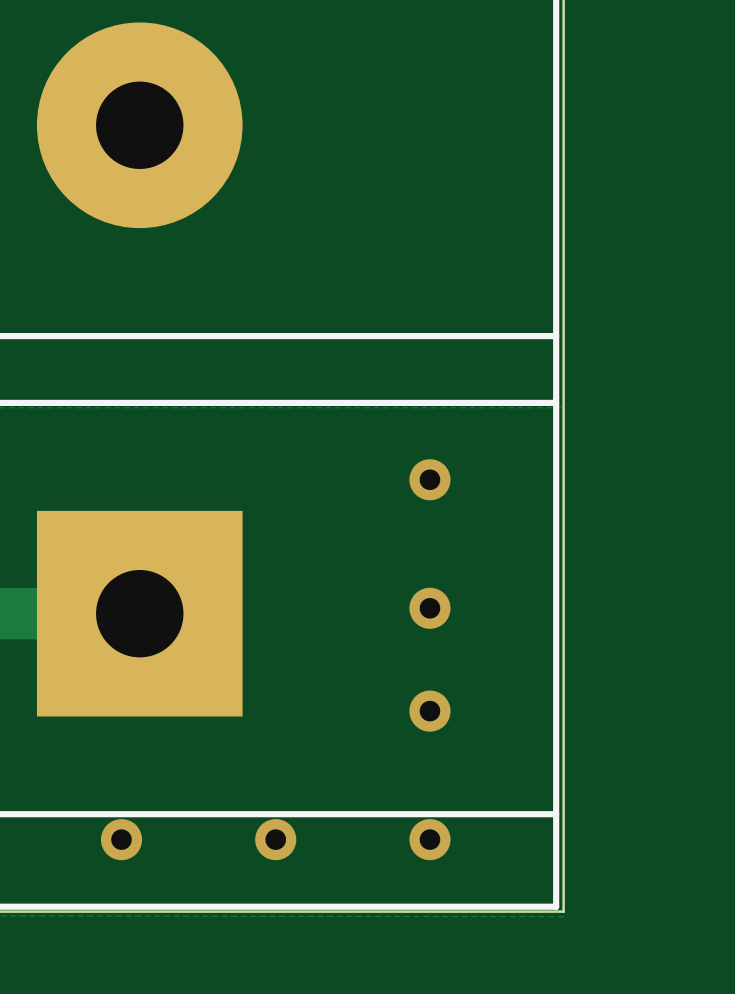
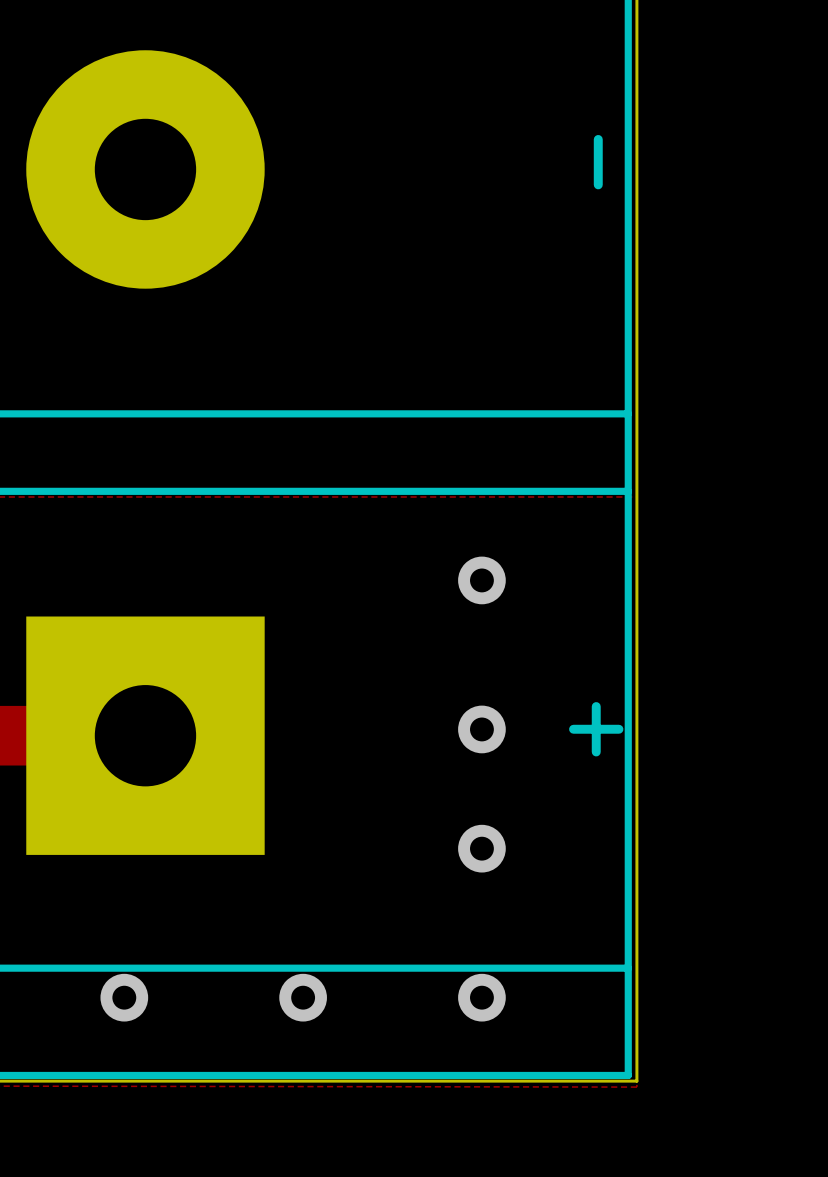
text: none -> - (598, 162)
text: none -> + (596, 729)

